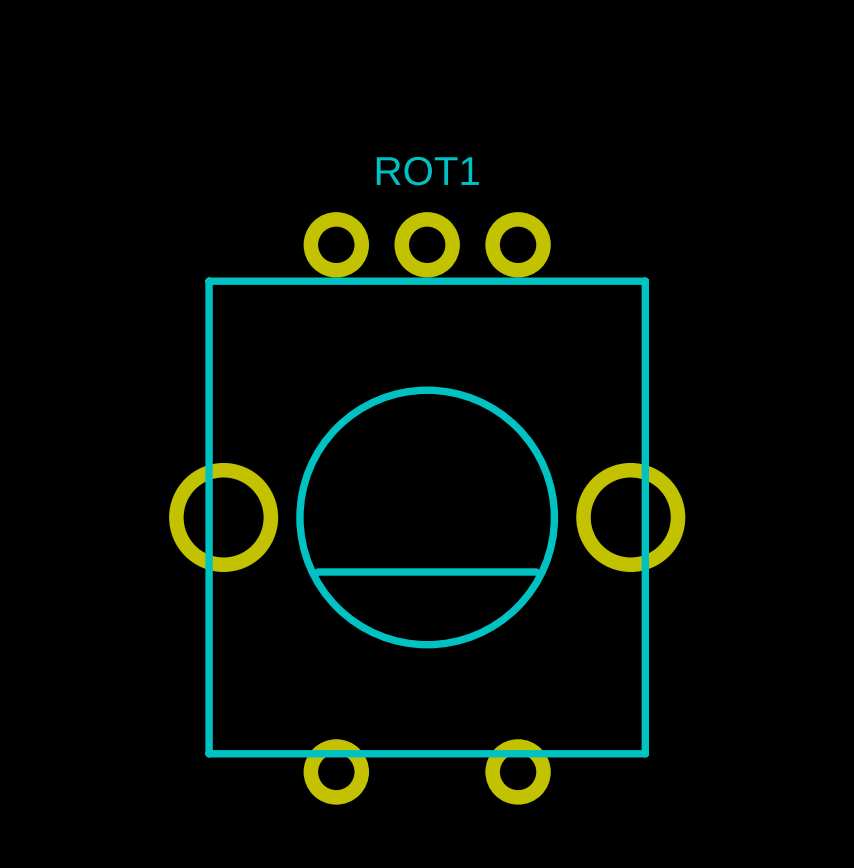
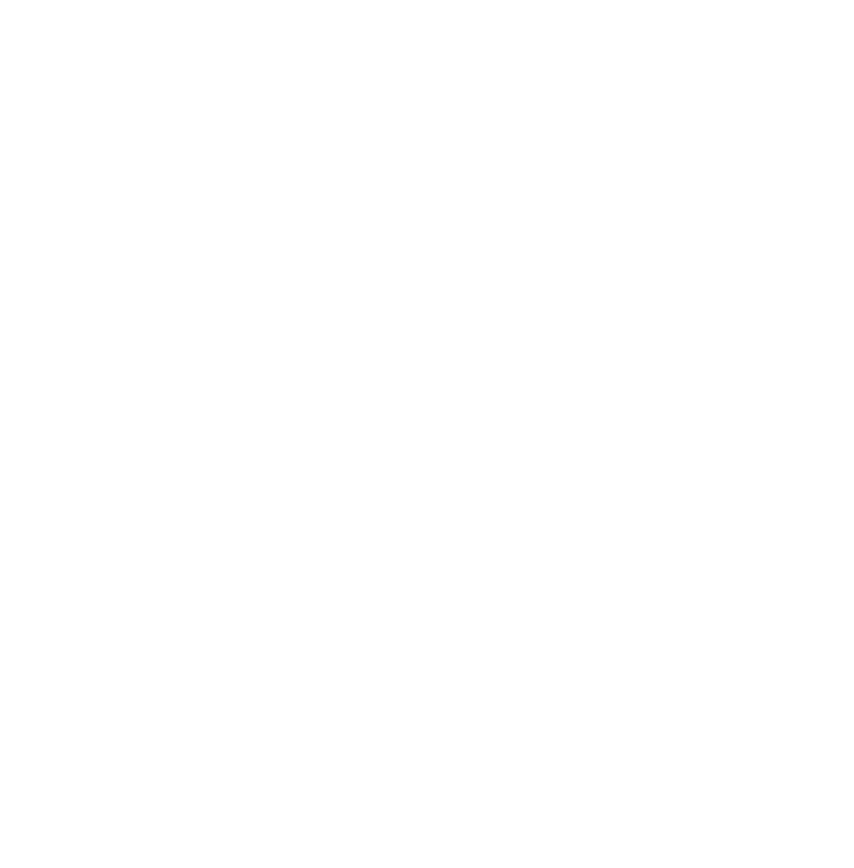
ROT1: (427, 508) -> none

